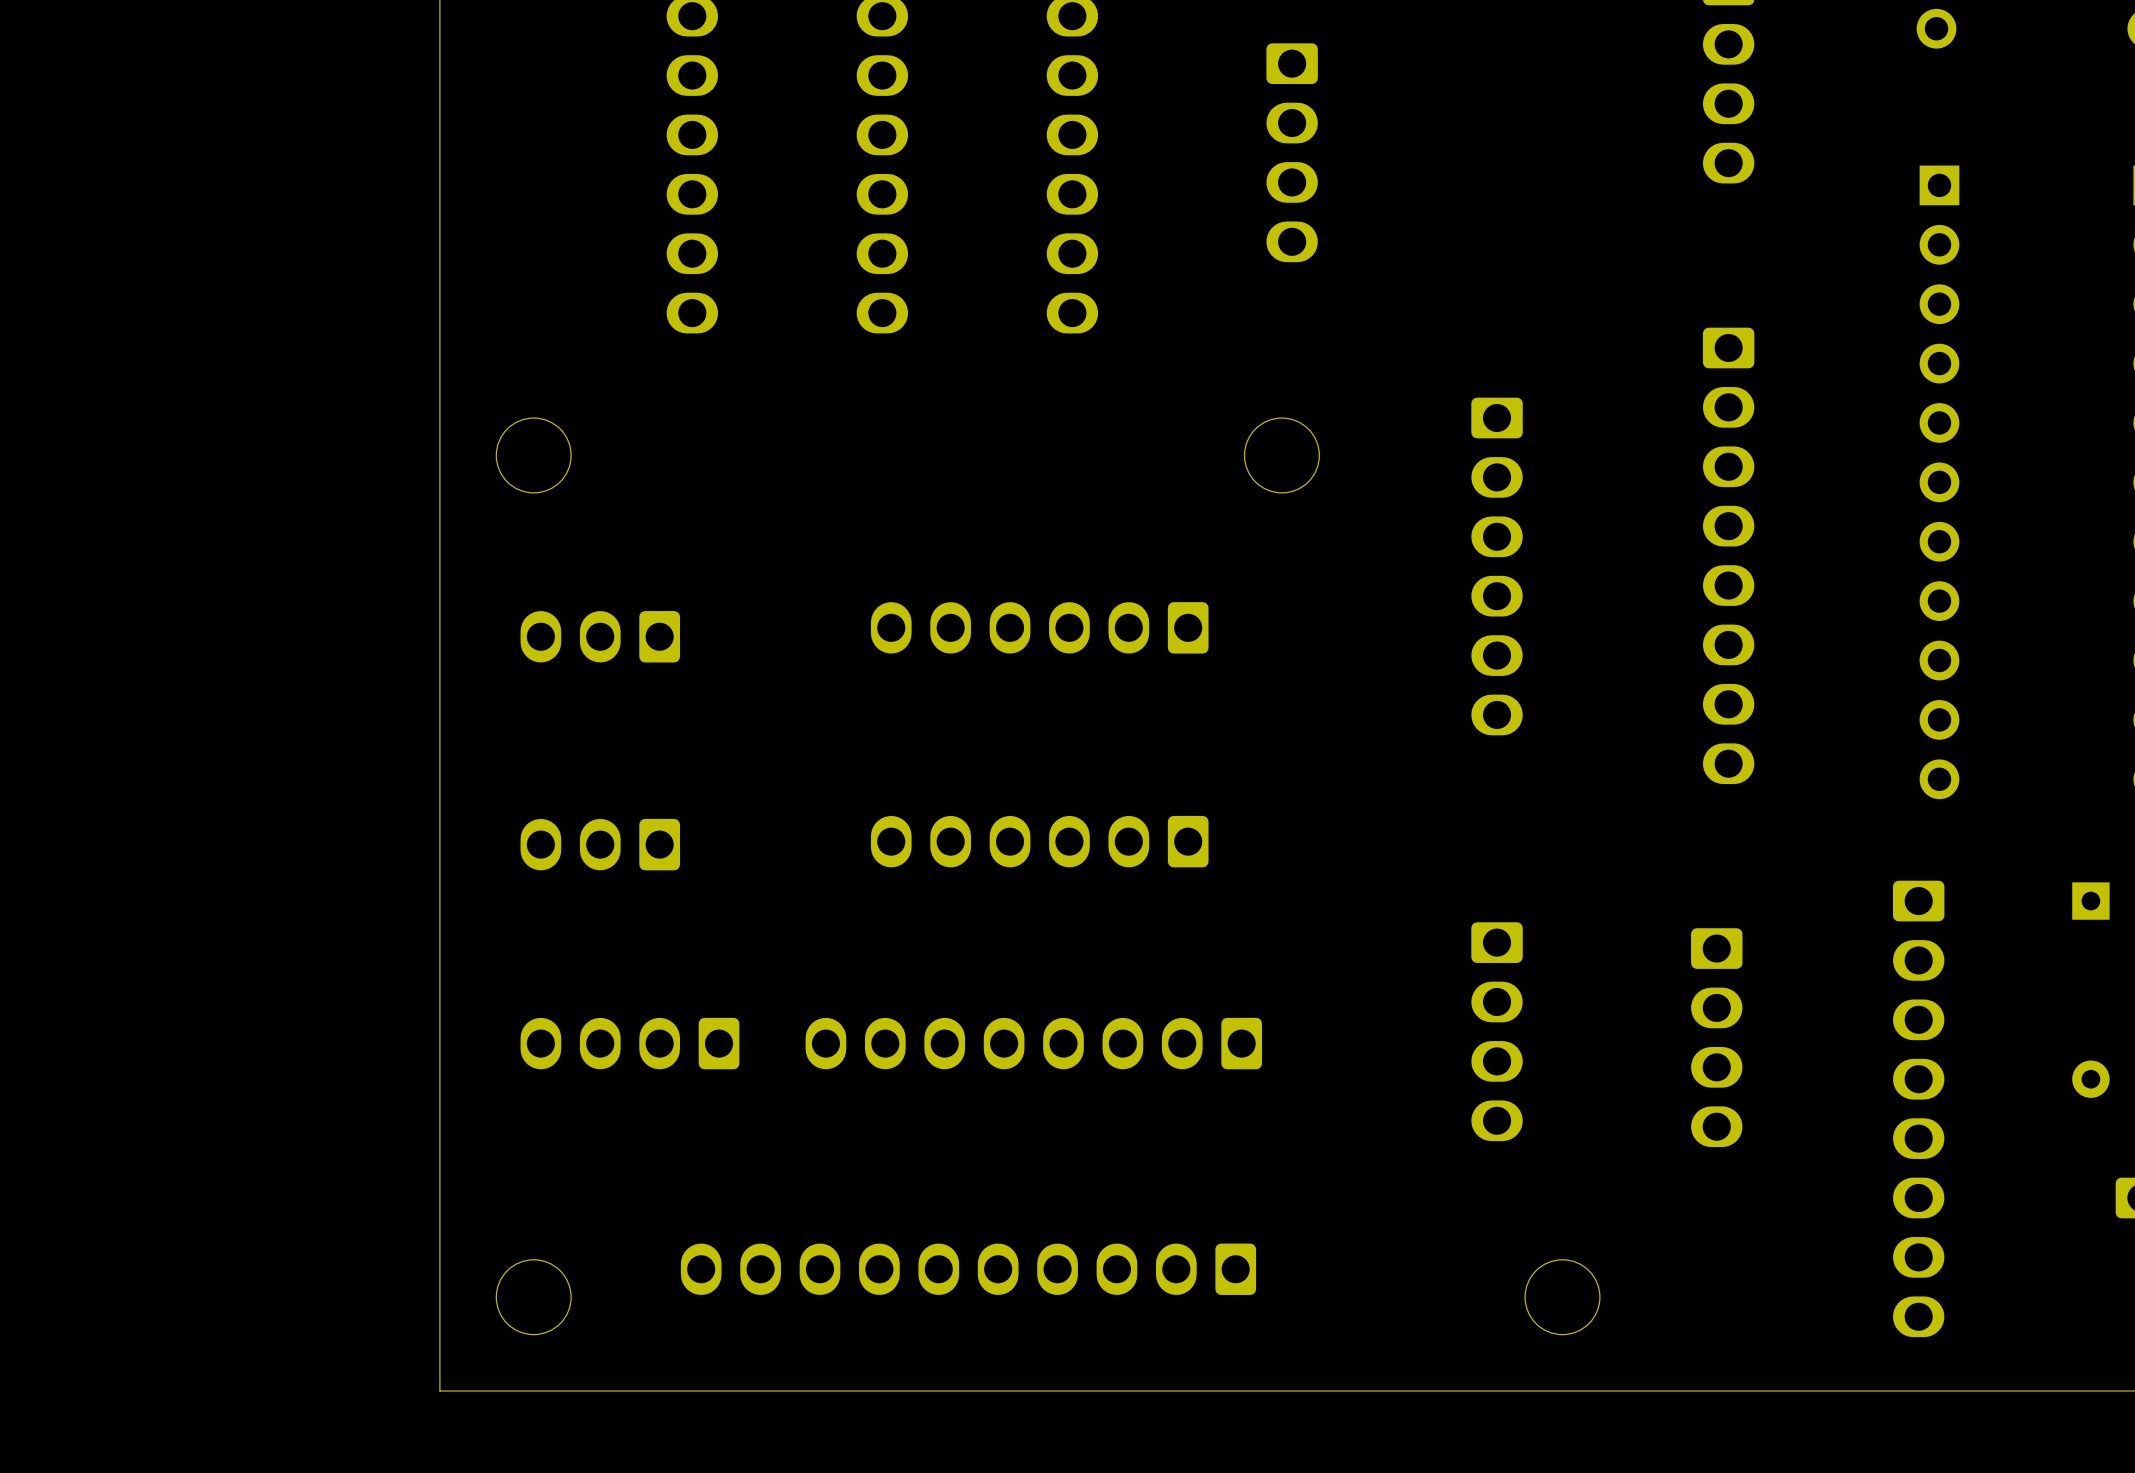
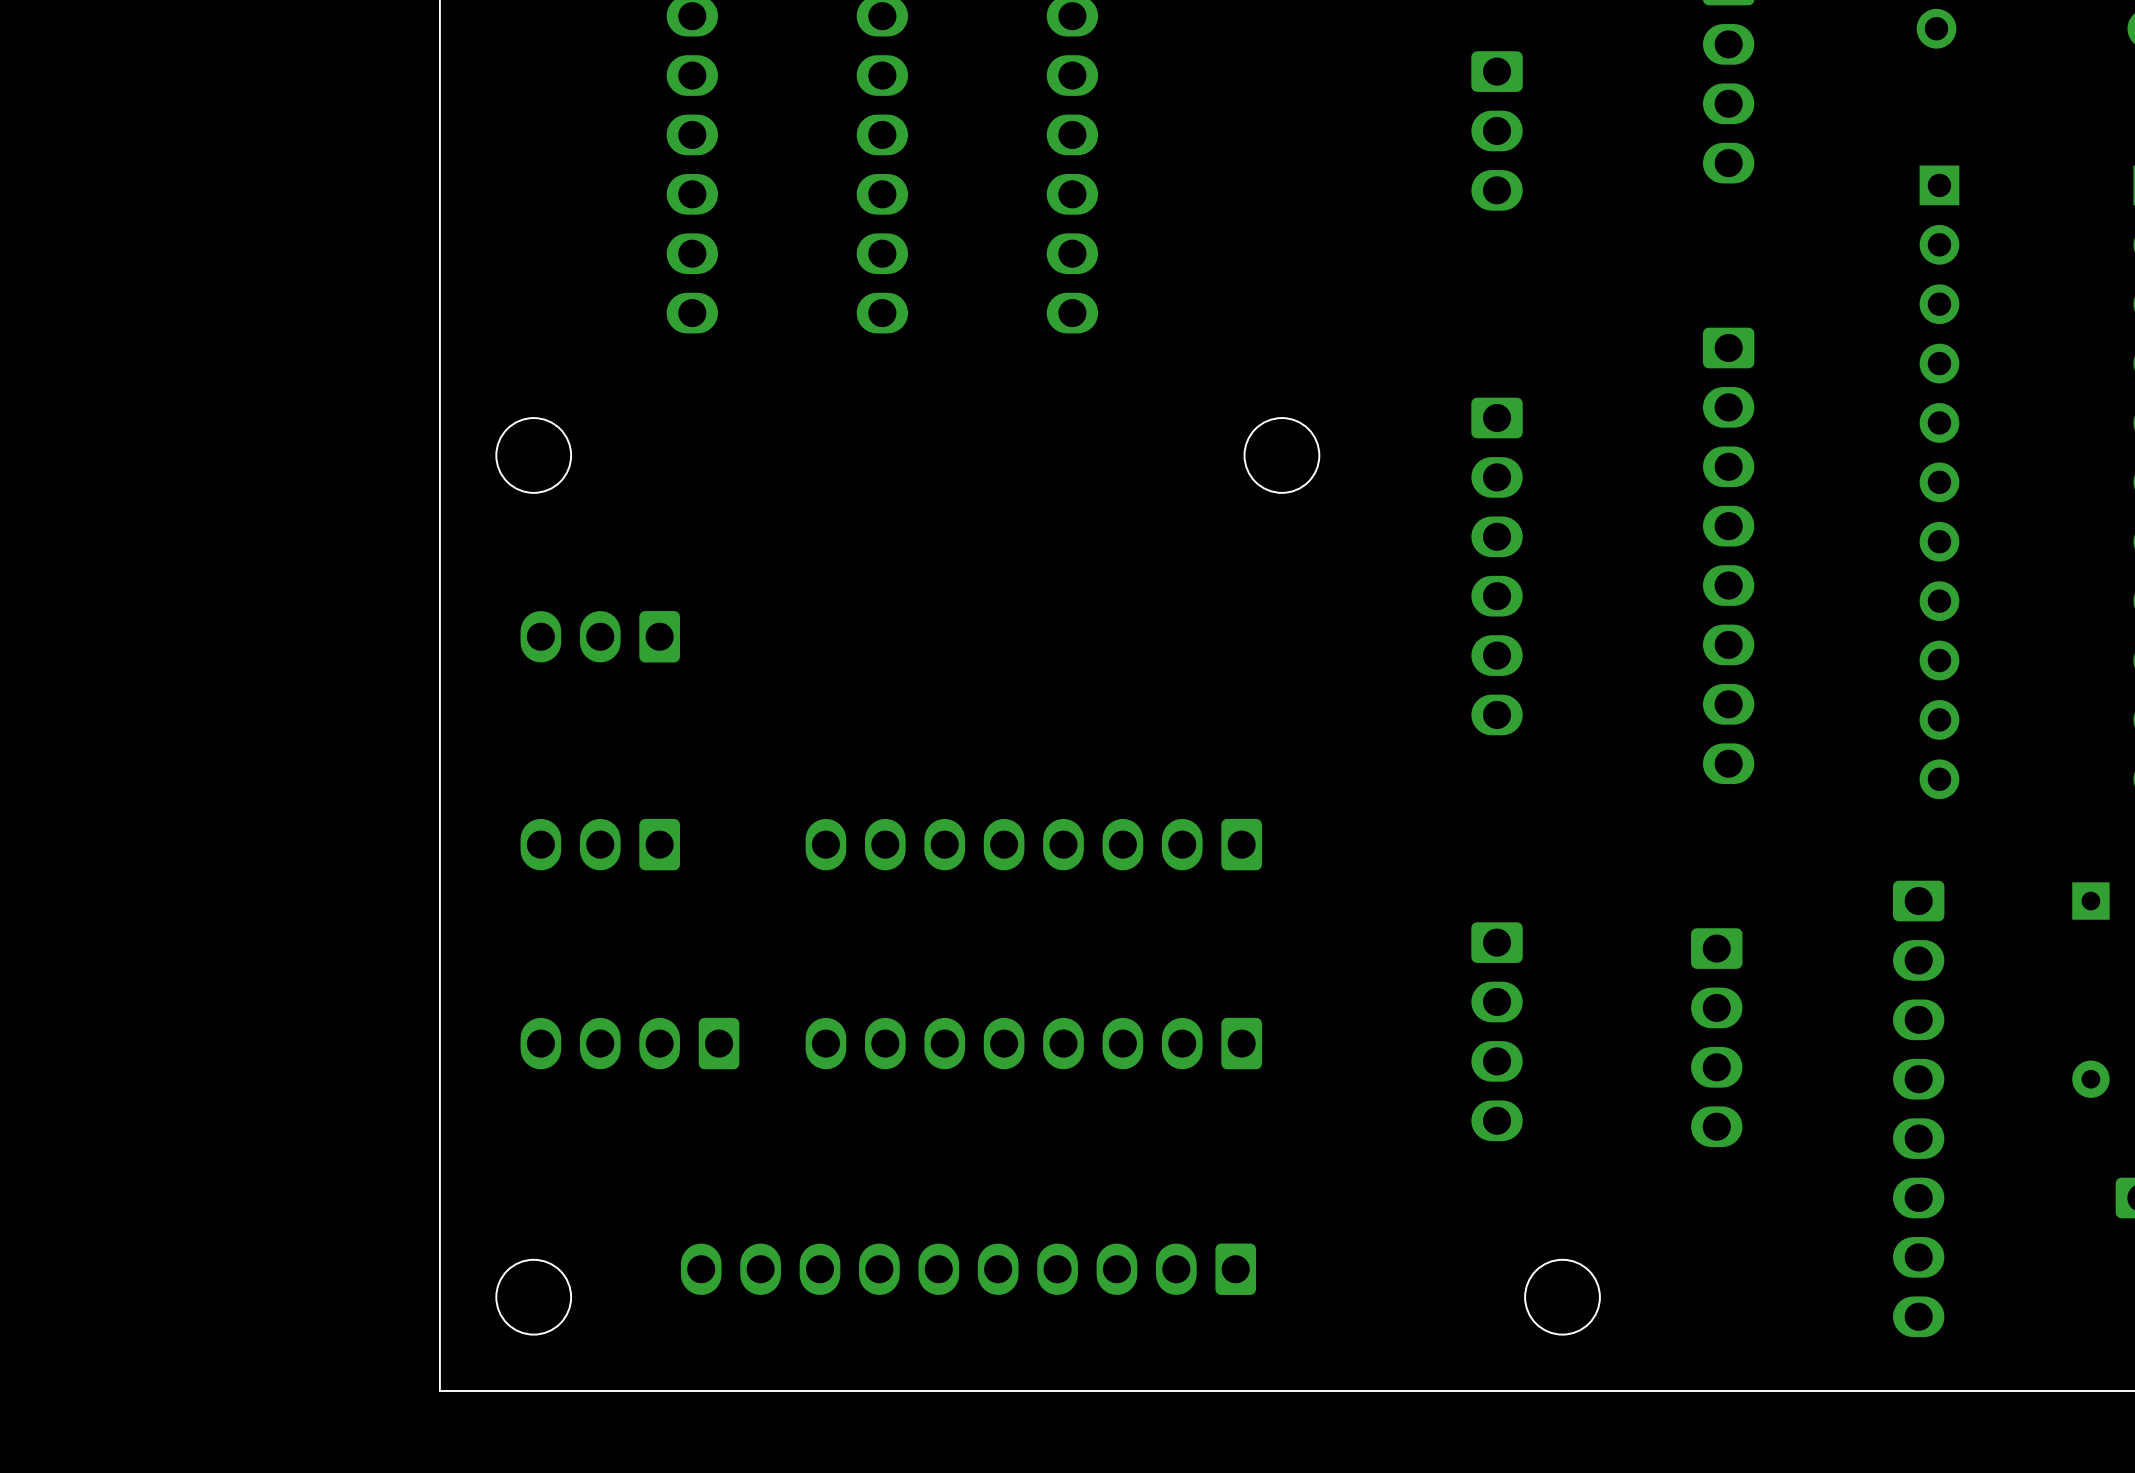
part: none -> (1497, 130)
part: (1292, 152) -> none
part: (1039, 627) -> none
part footprint: [870, 815, 1209, 868] -> [805, 818, 1263, 871]

